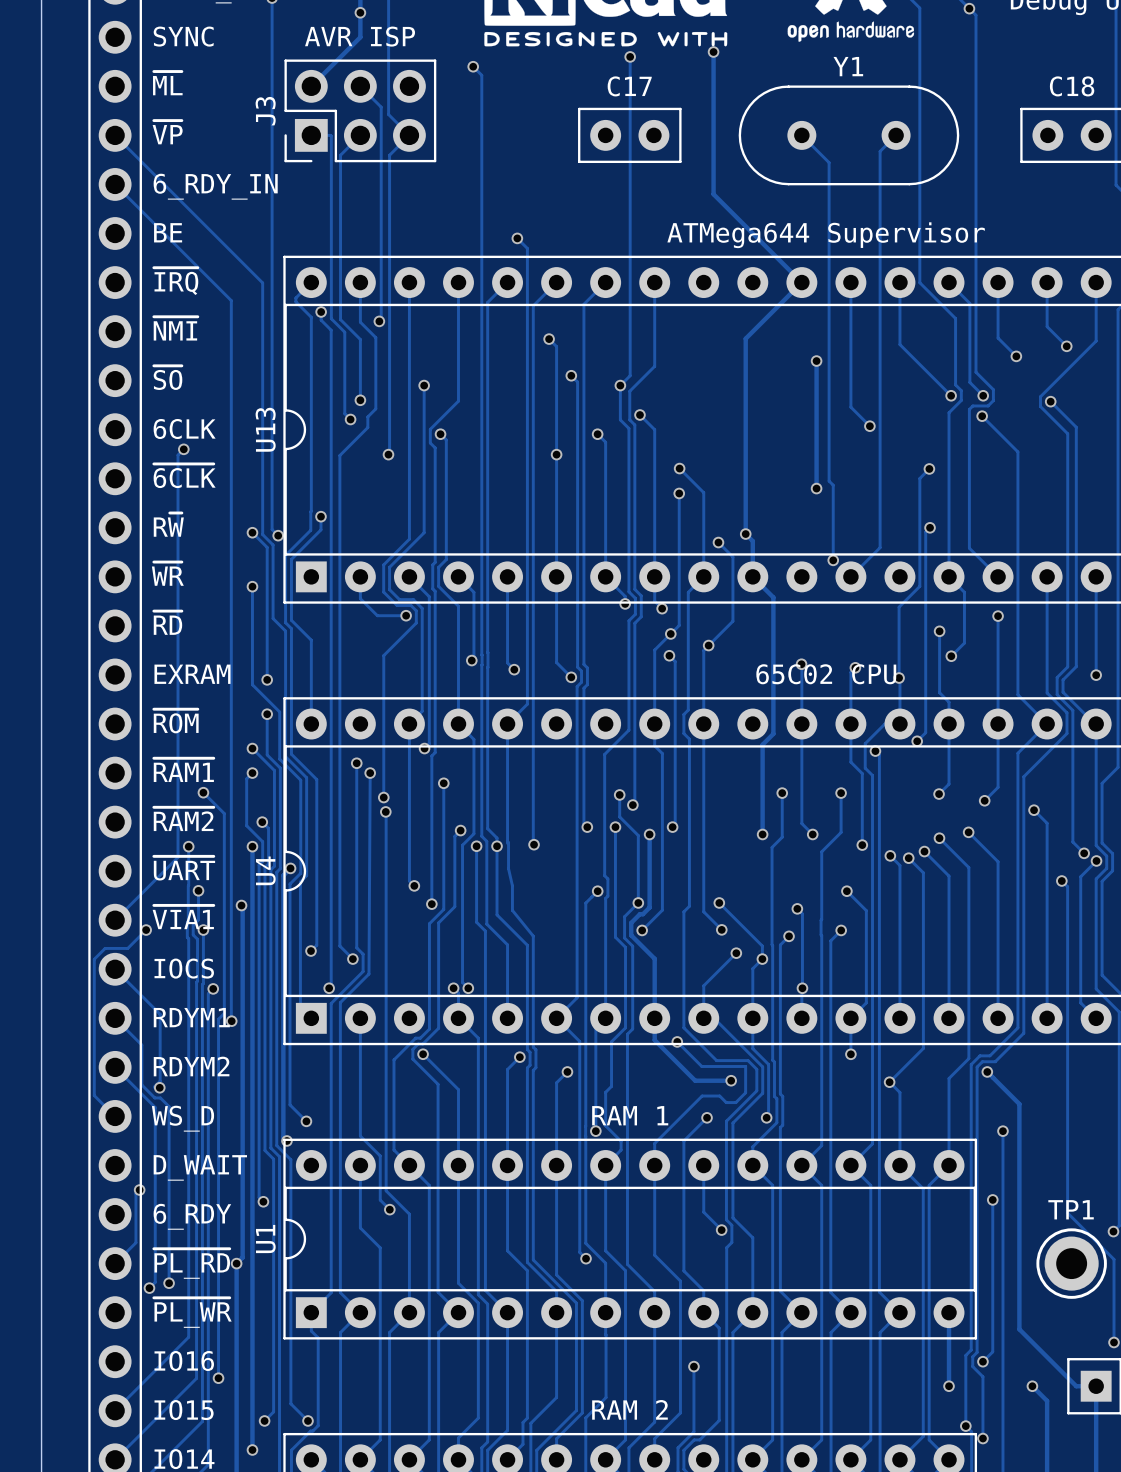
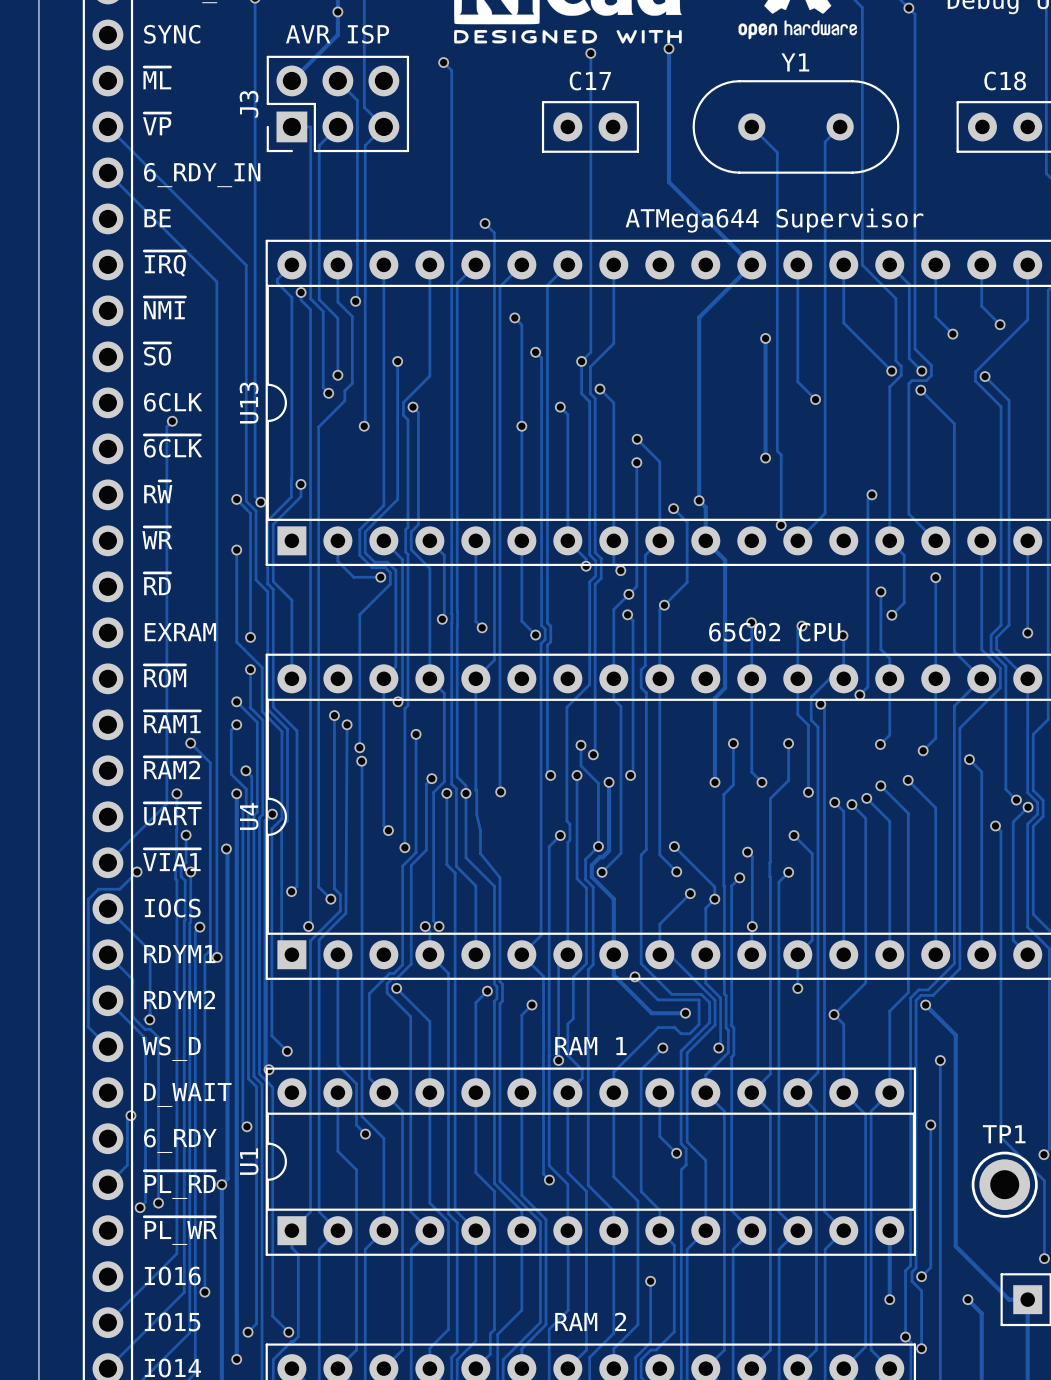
track: (929, 468) (919, 478) (919, 586) (899, 607) (899, 678) -> none
via: (929, 468) -> none

